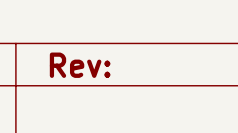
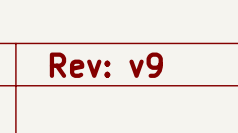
title block: Rev: (80, 65) -> Rev: v9 (106, 65)

